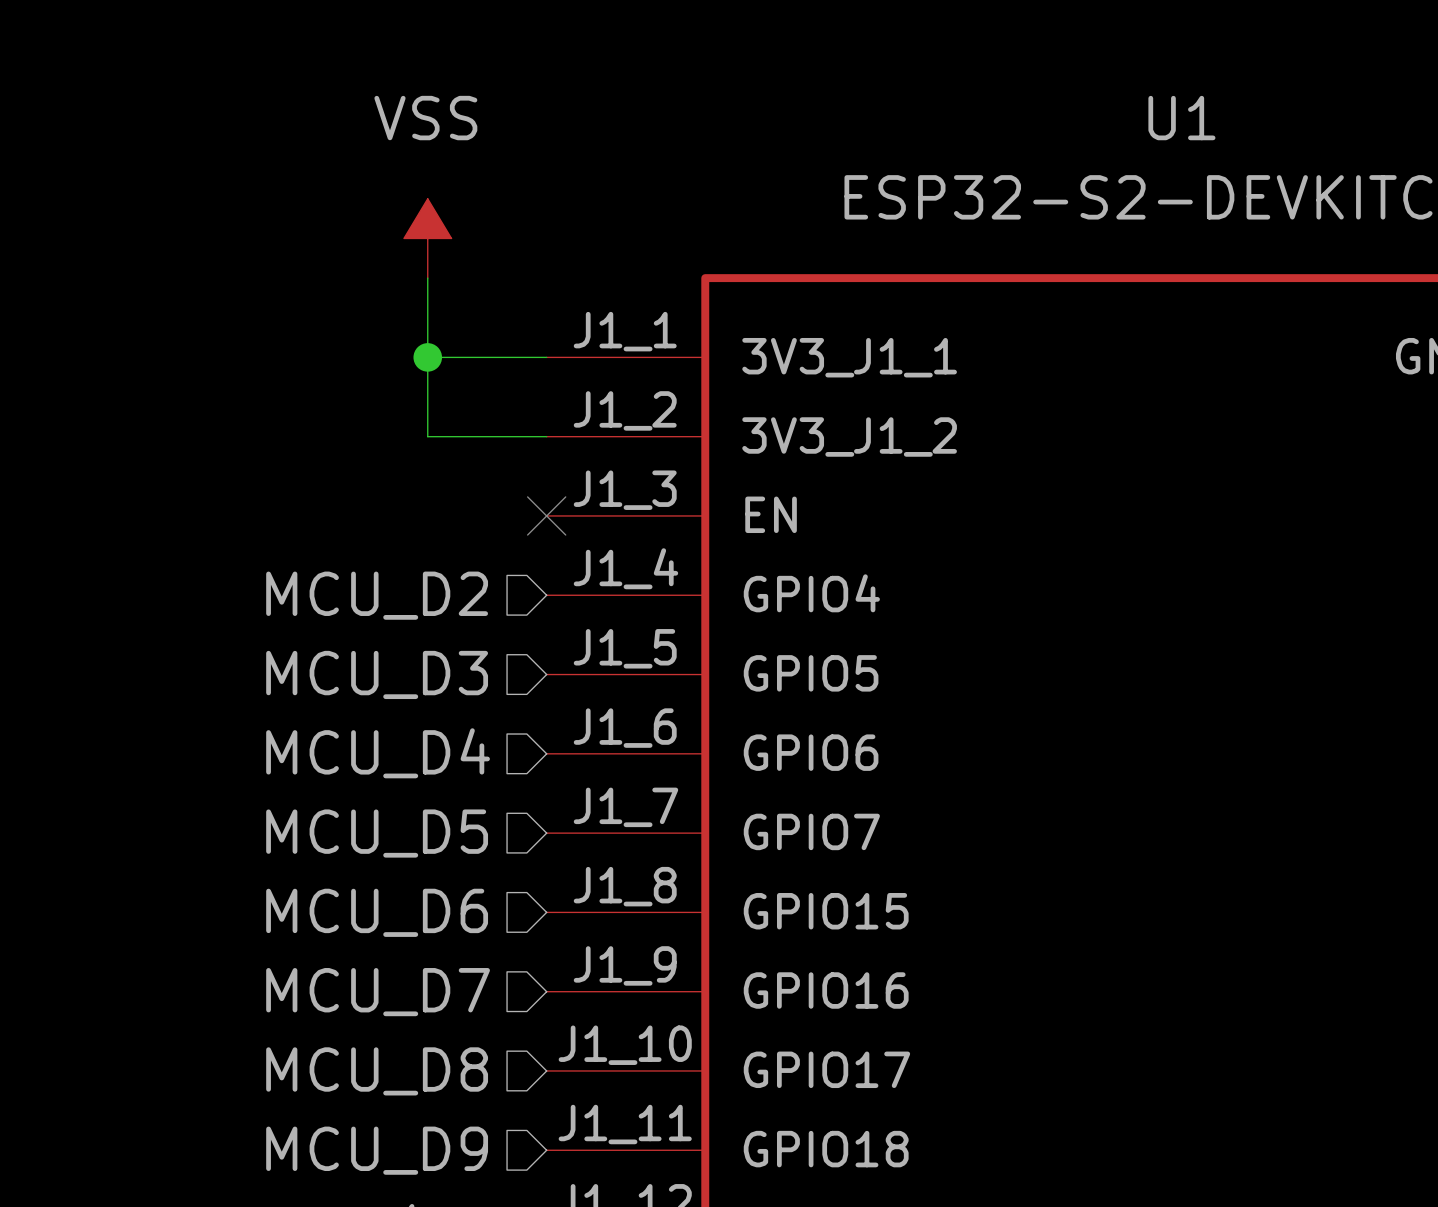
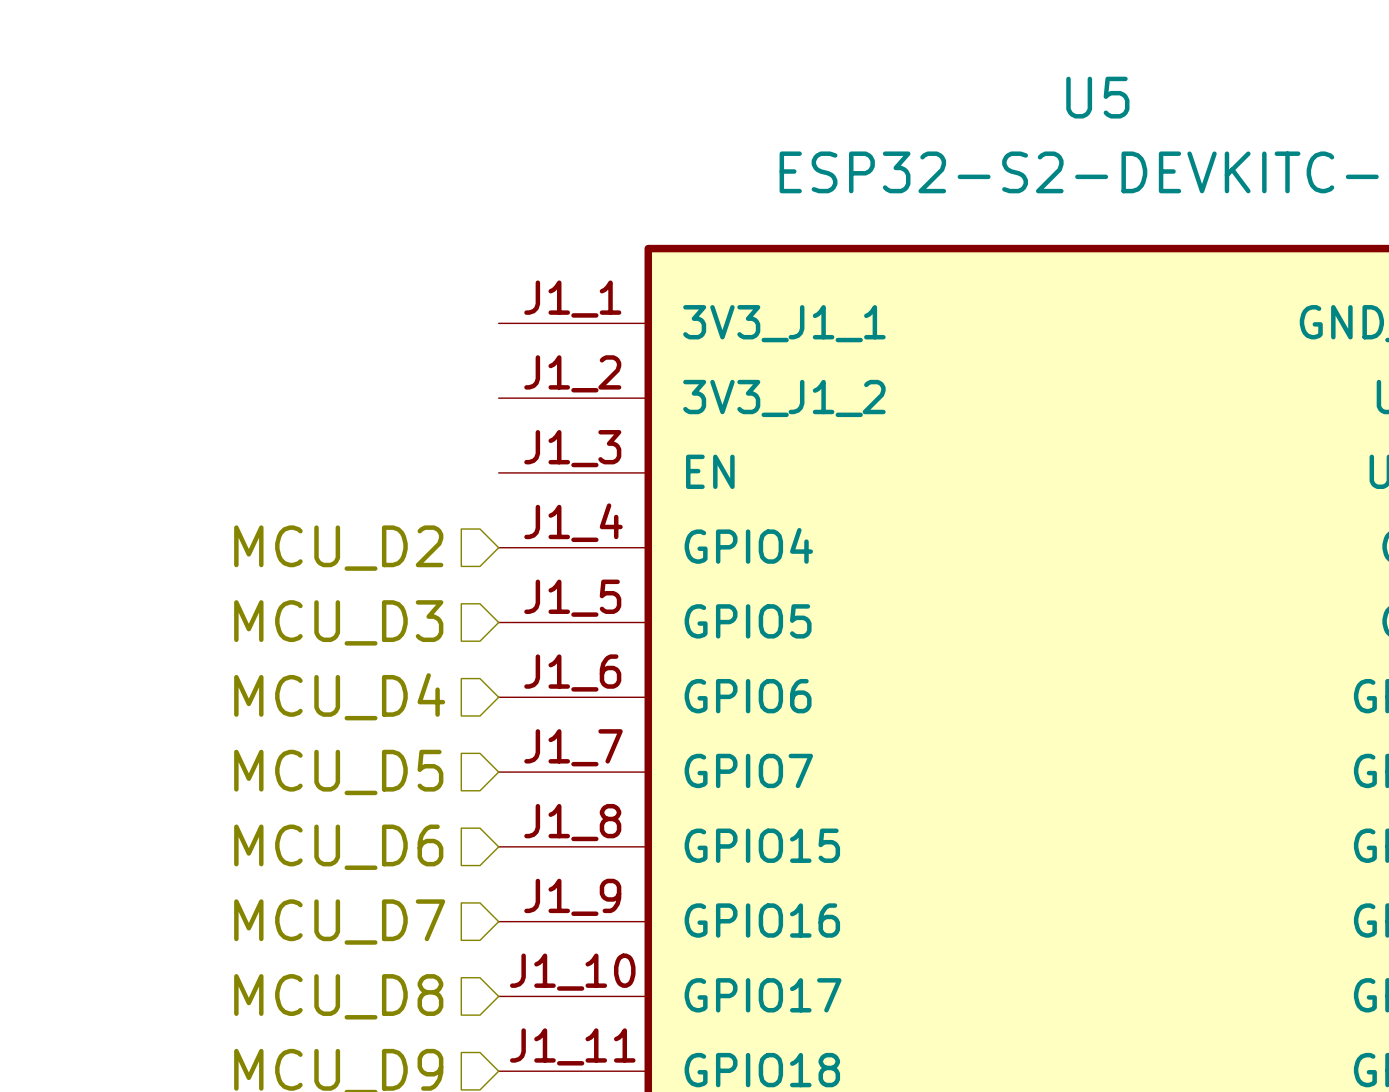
U1 name: U1 (1181, 118) -> U5 (1097, 97)
power symbol: VSS (427, 238) -> none
wire: (427, 278) (427, 436) (546, 436) -> none
wire: (427, 357) (546, 357) -> none
junction: (427, 357) -> none
no-connect mark: (546, 515) -> none

